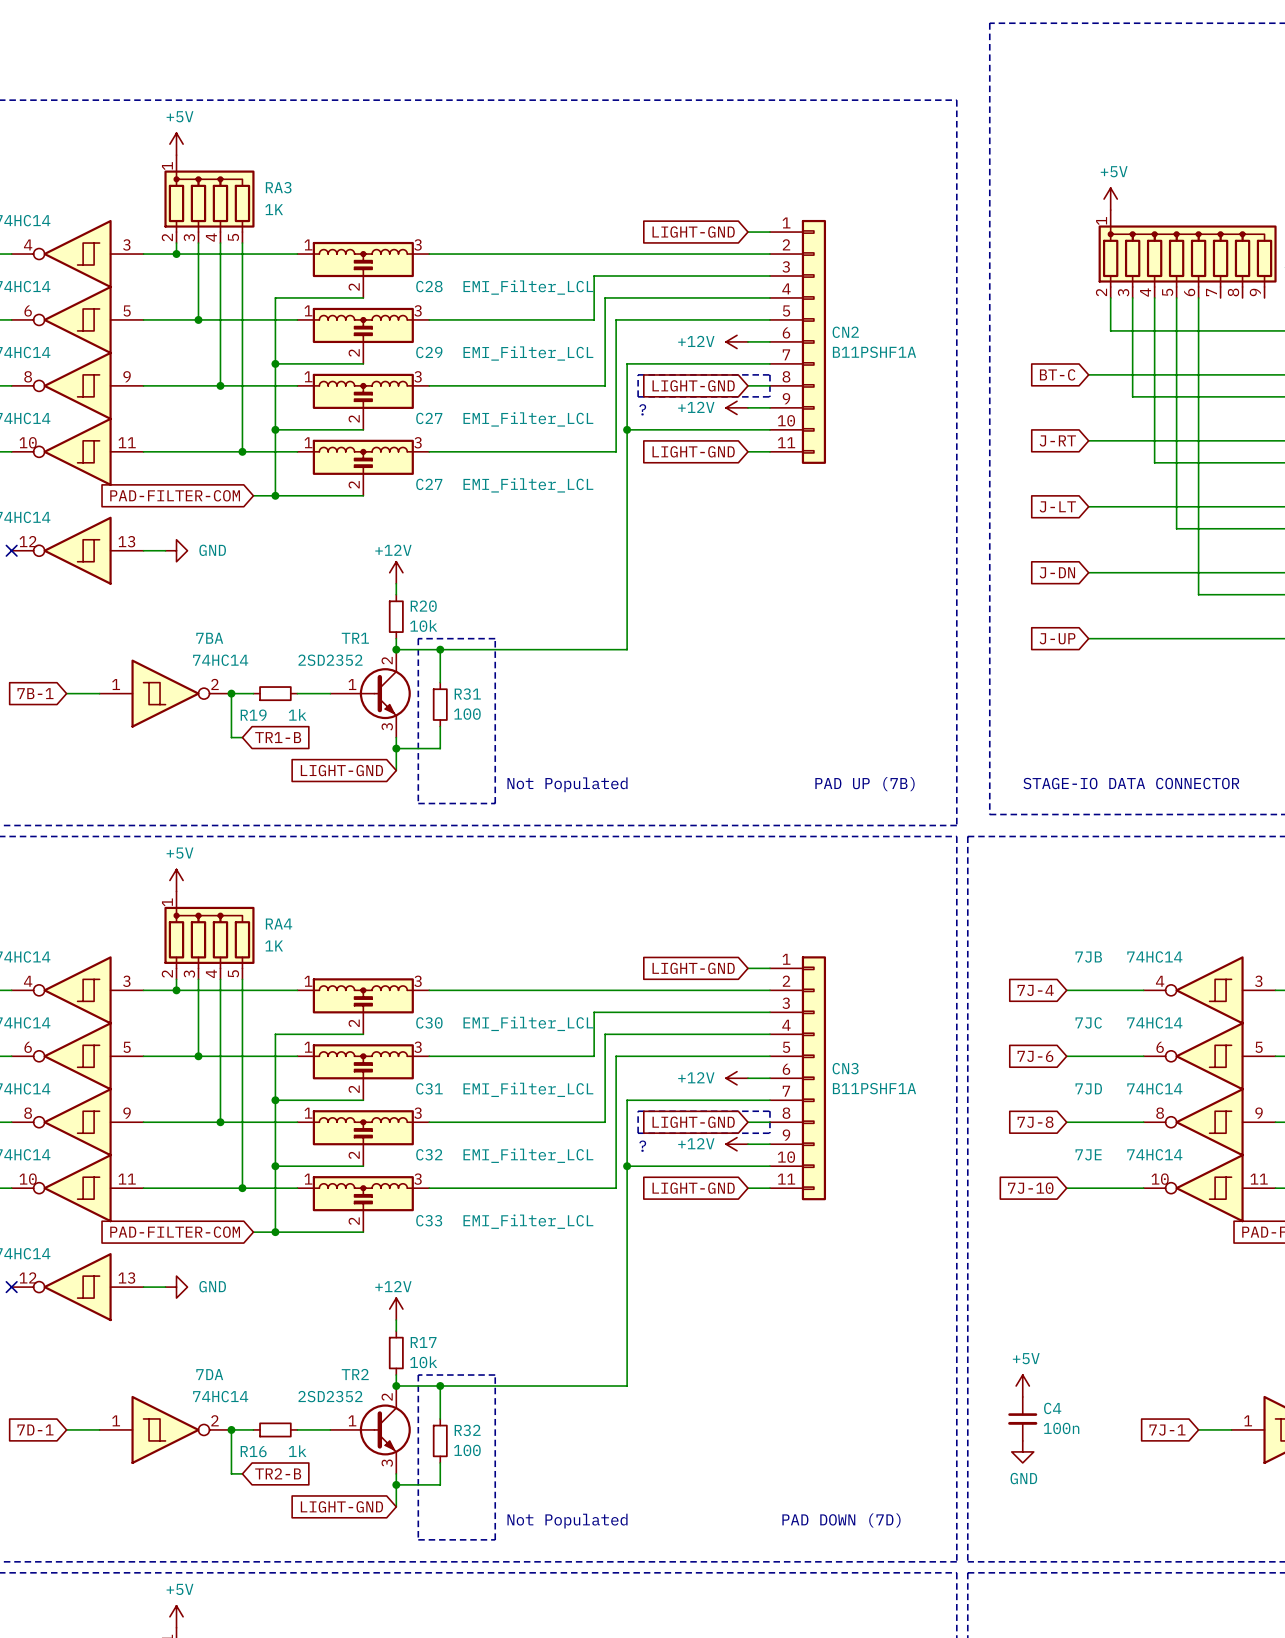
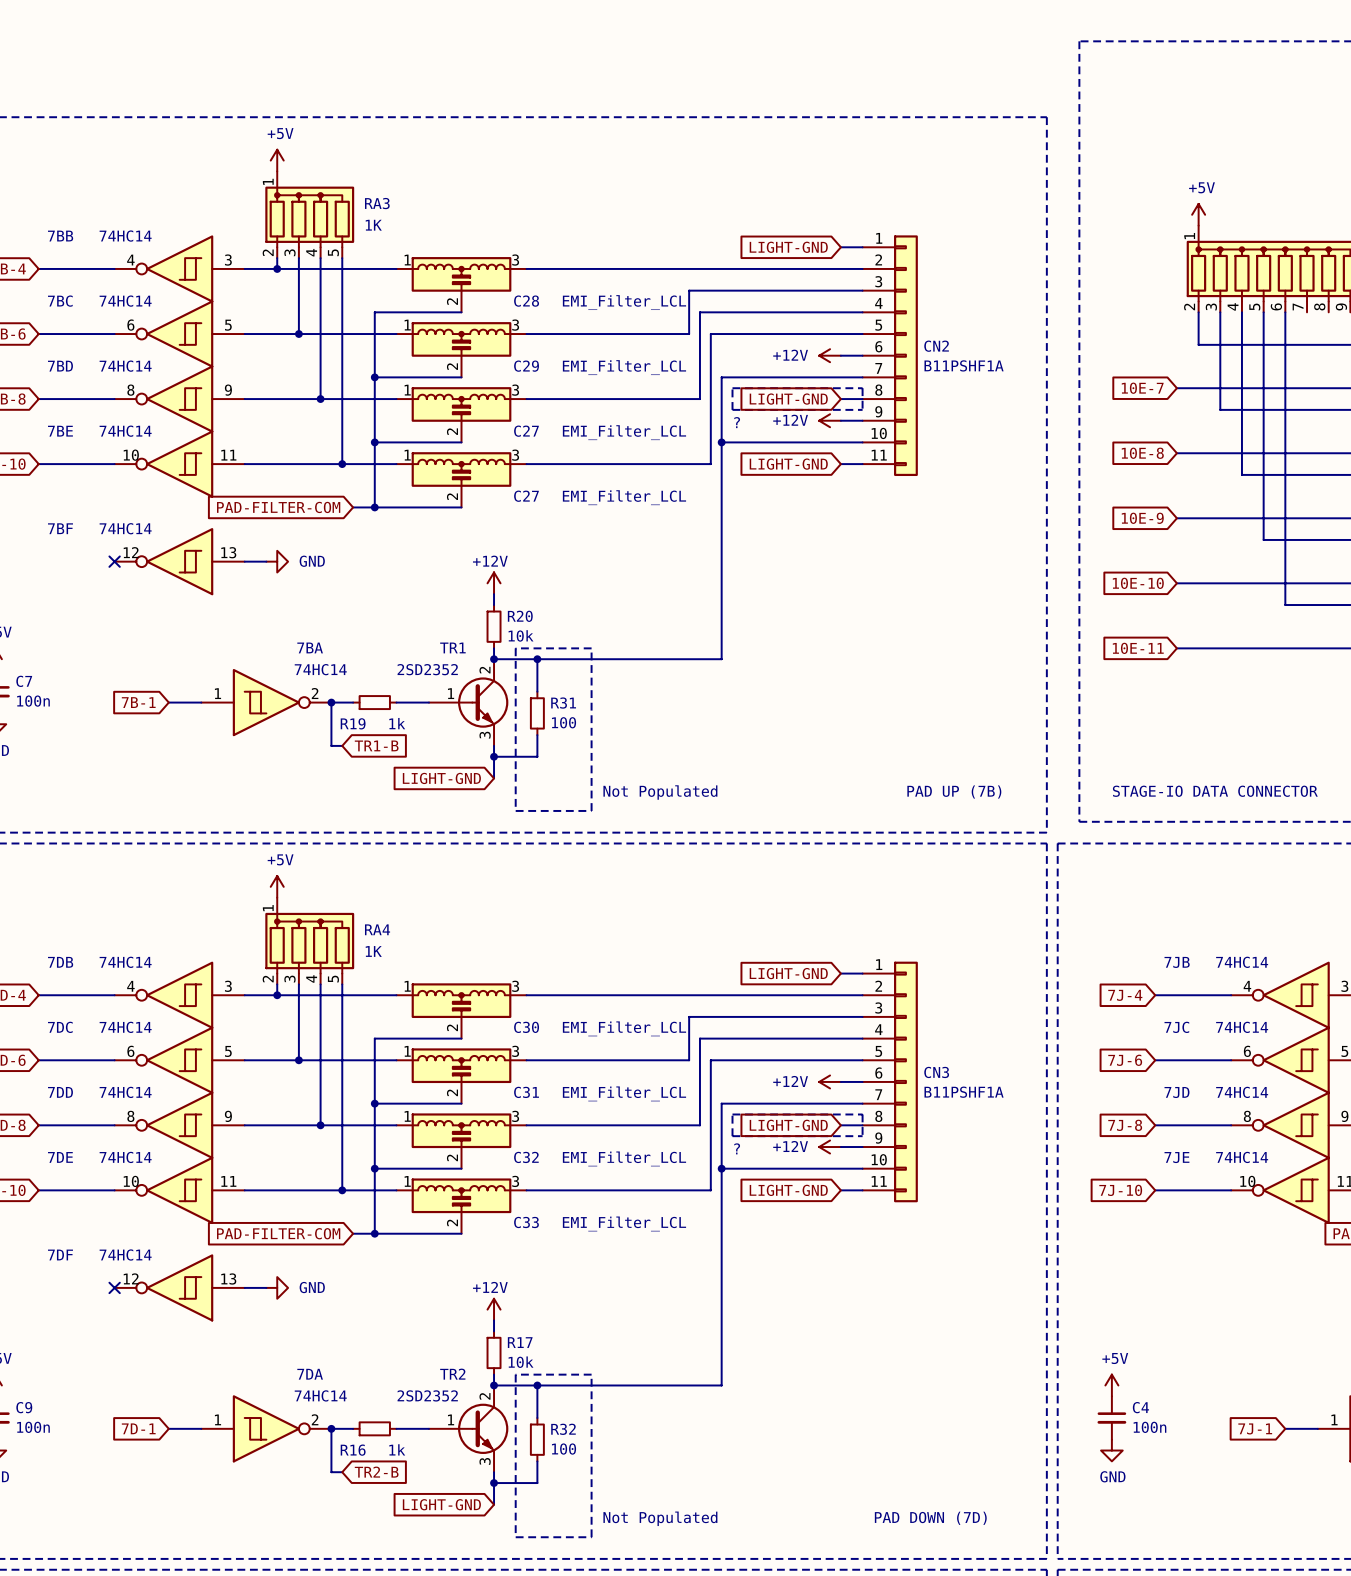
global label: BT-C (1057, 374) -> 10E-7 (1142, 388)
global label: J-RT (1057, 440) -> 10E-8 (1142, 453)
global label: J-LT (1057, 506) -> 10E-9 (1142, 518)
global label: J-DN (1057, 572) -> 10E-10 (1138, 583)
global label: J-UP (1057, 638) -> 10E-11 (1138, 648)

